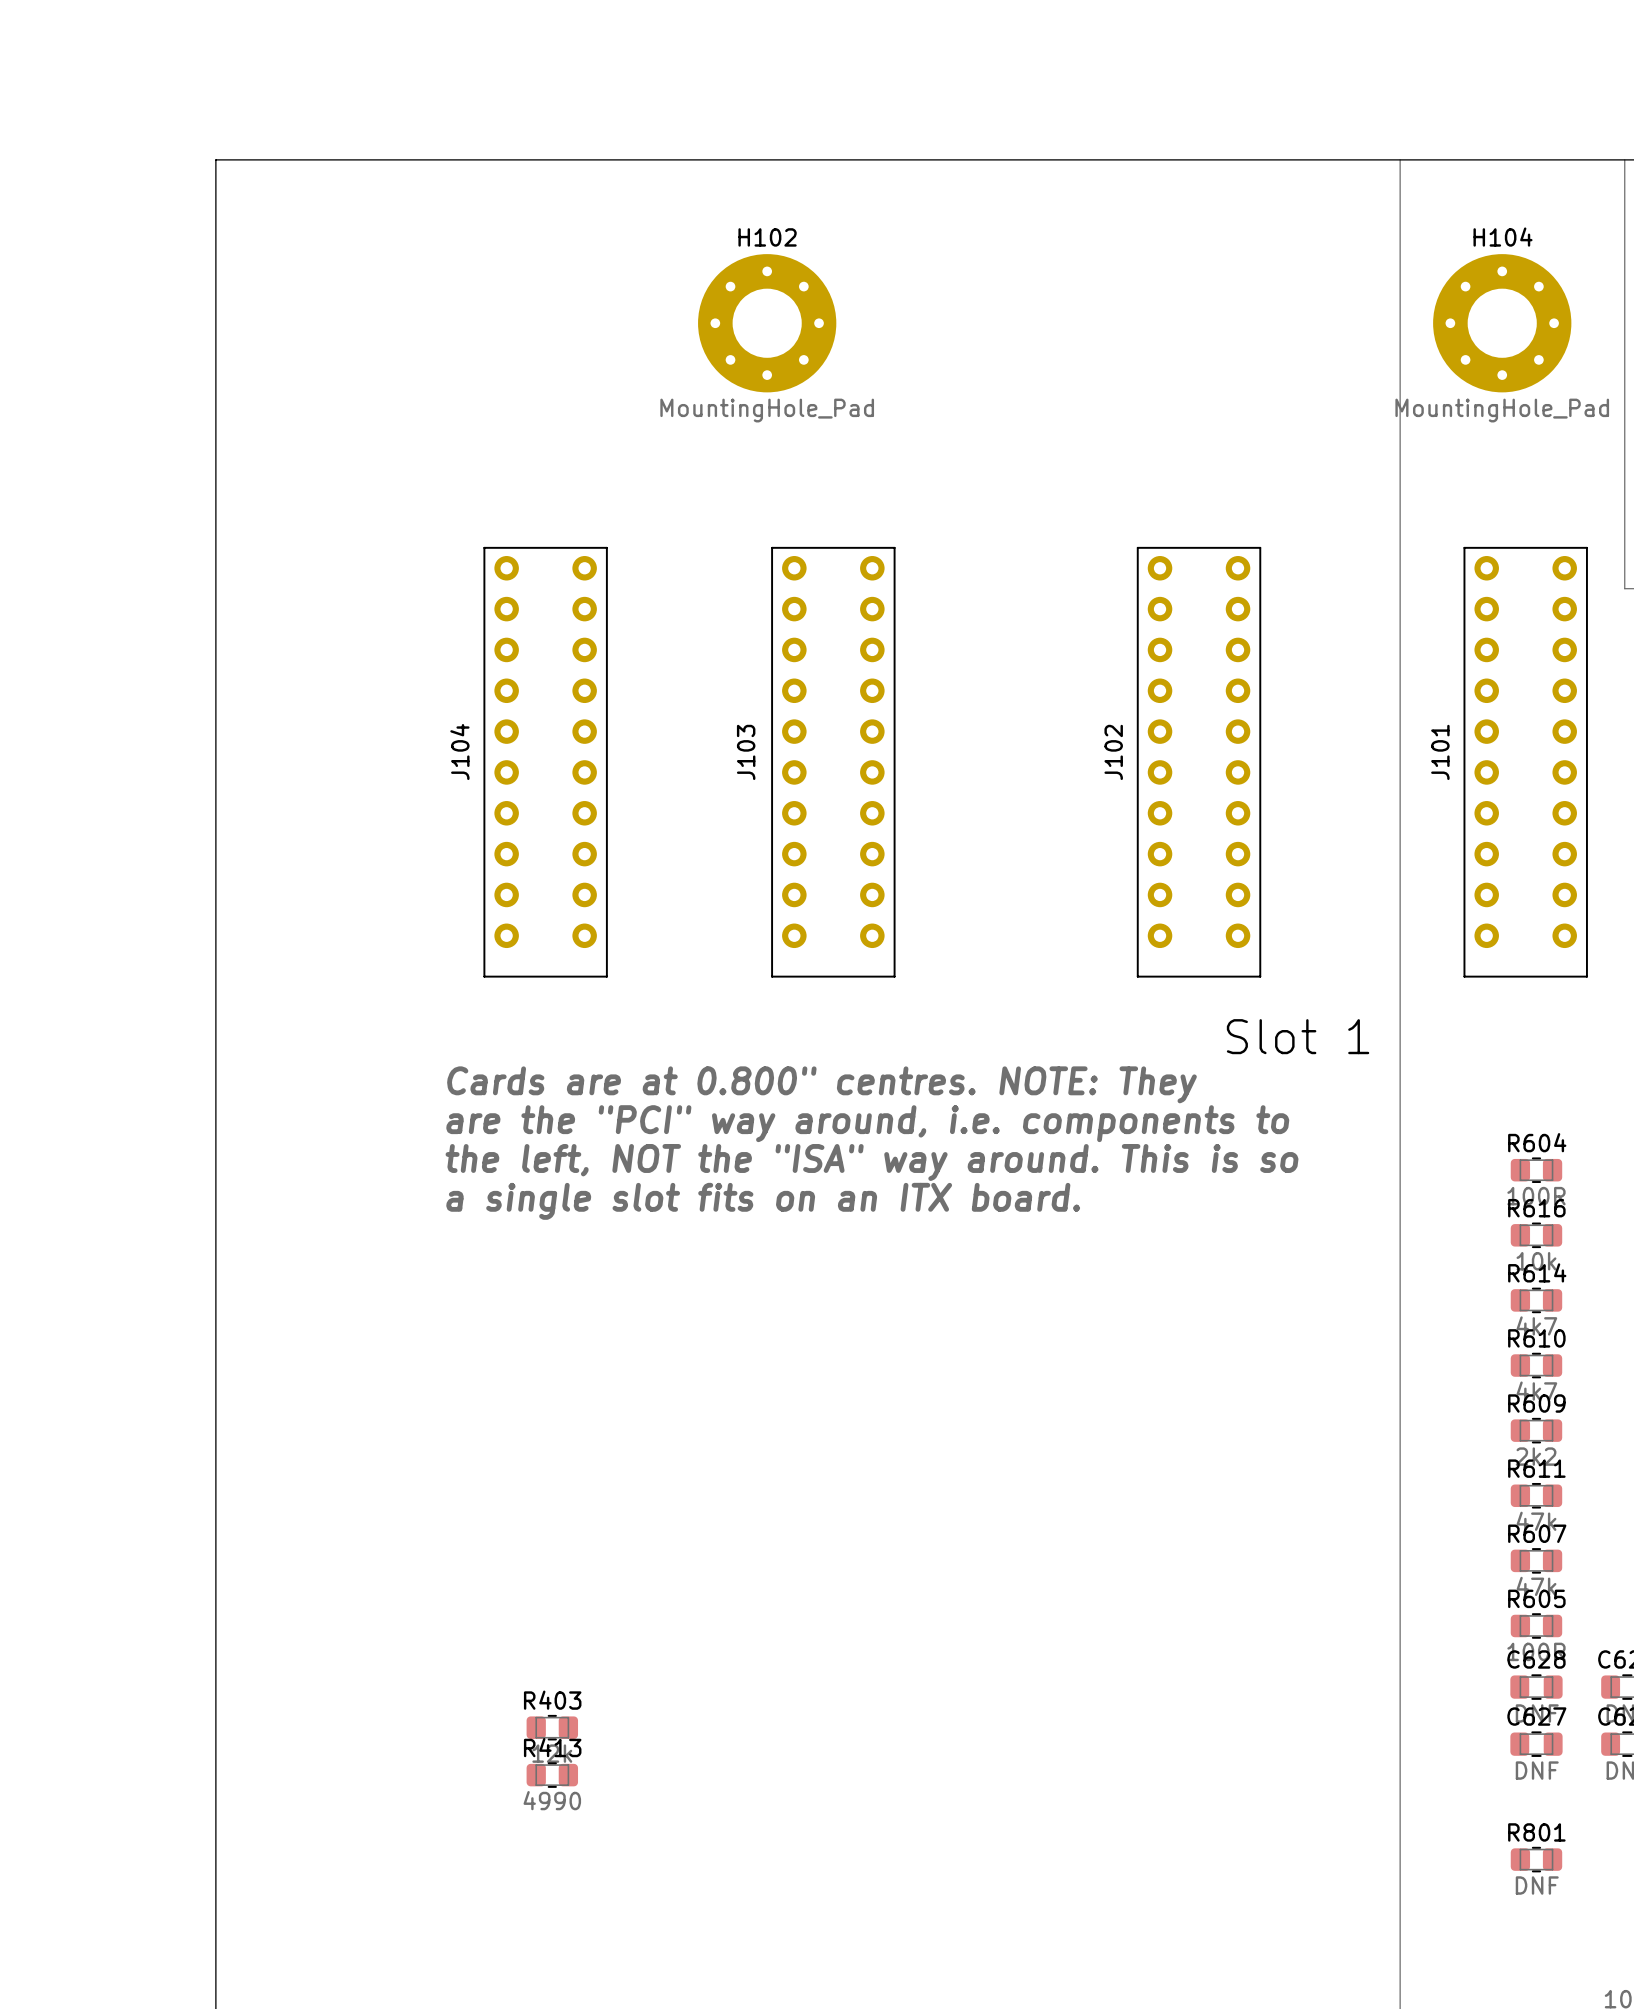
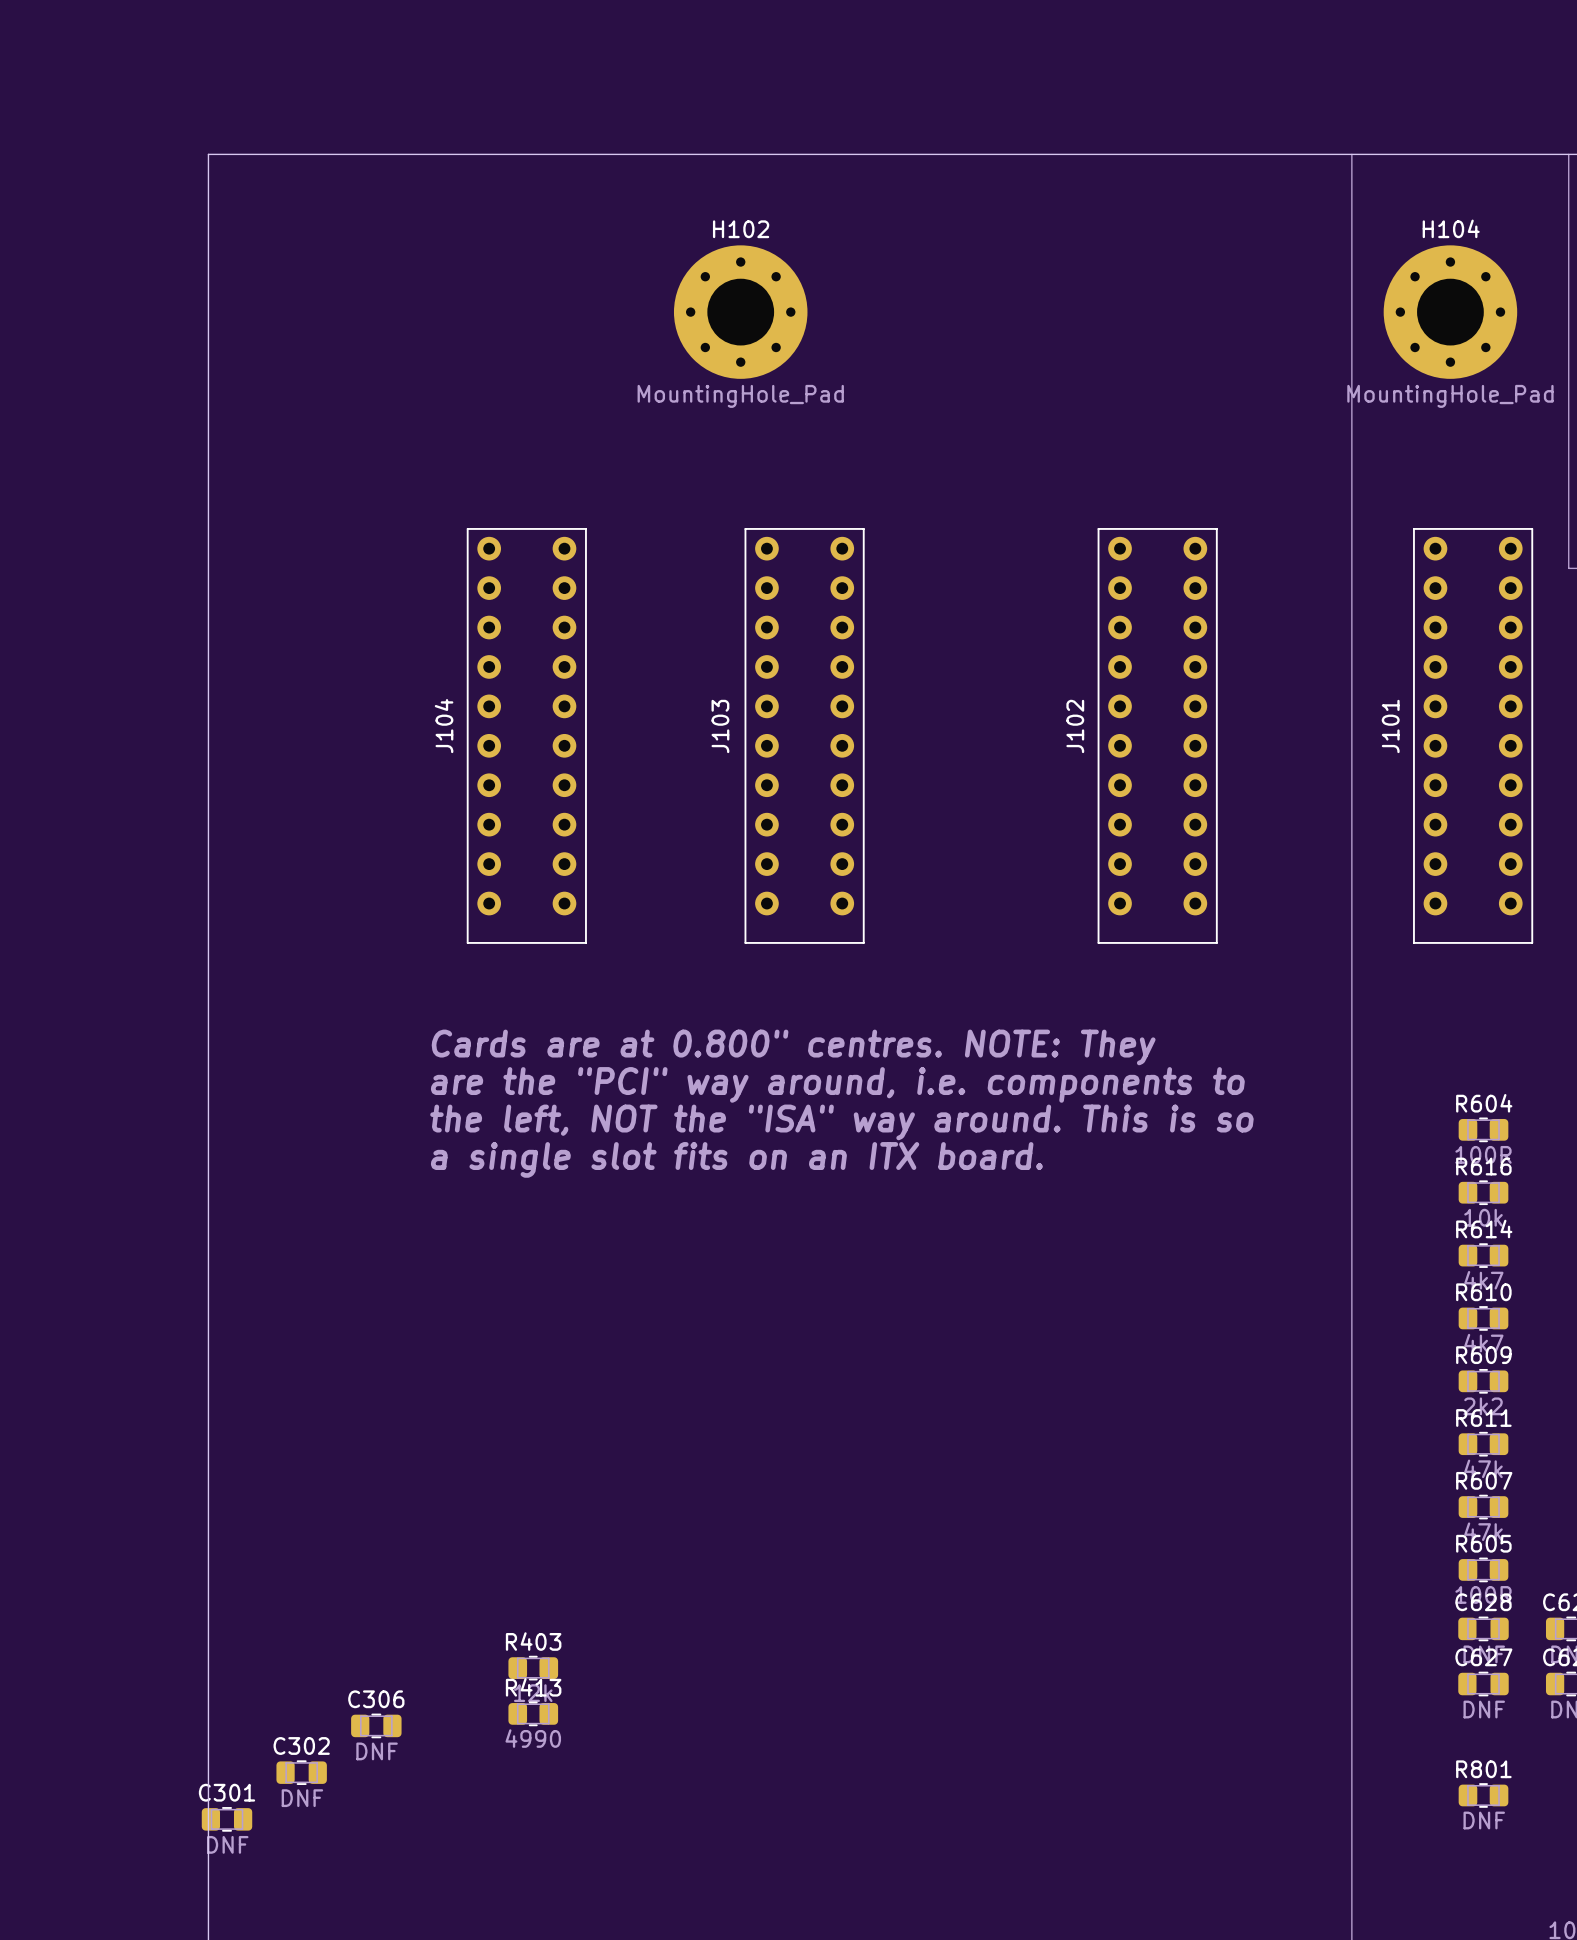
text: Slot 1 (1298, 1036) -> none
C306: none -> DNF (376, 1725)
C302: none -> DNF (301, 1772)
C301: none -> DNF (227, 1819)

